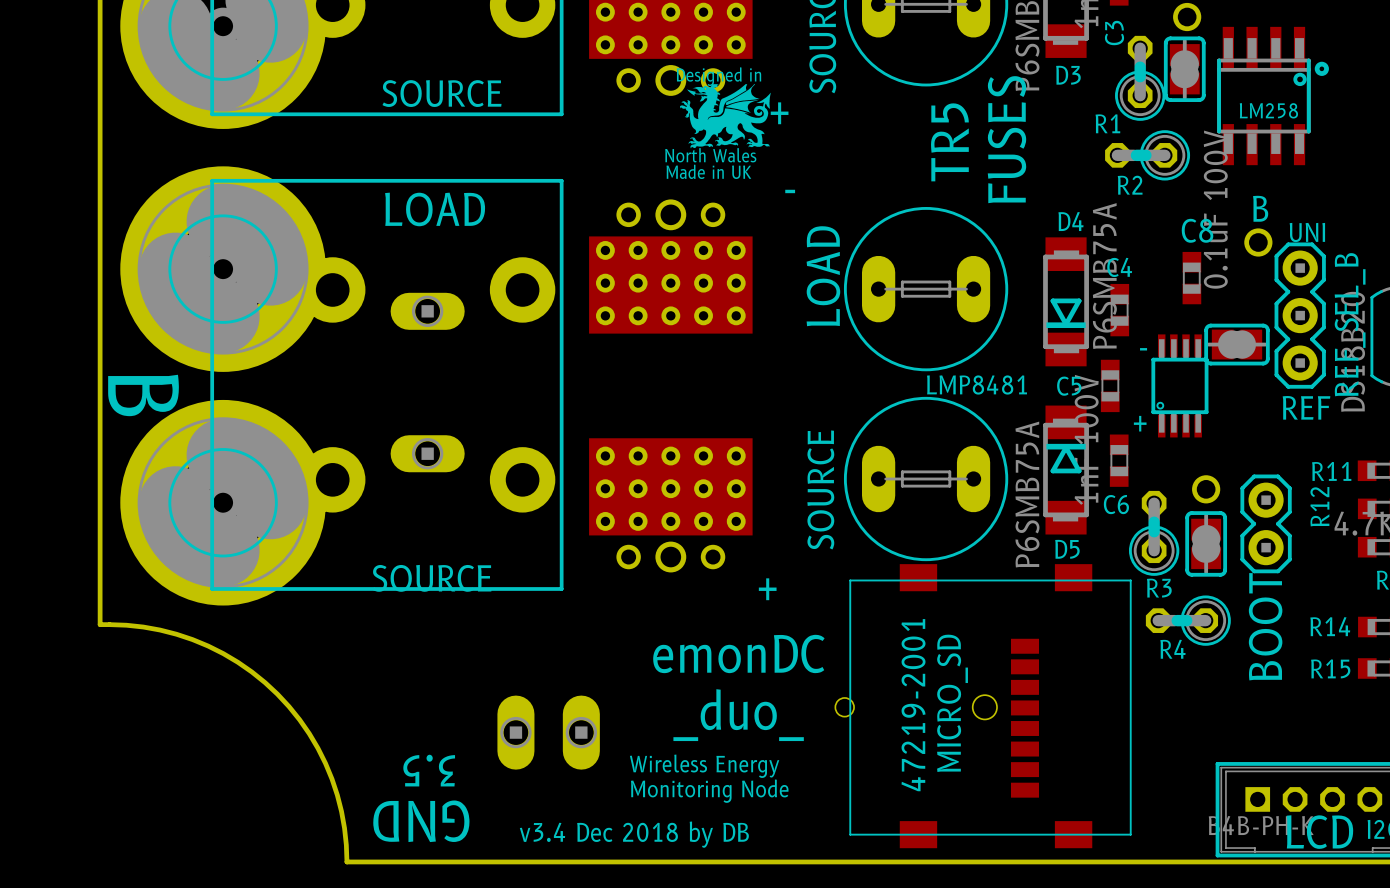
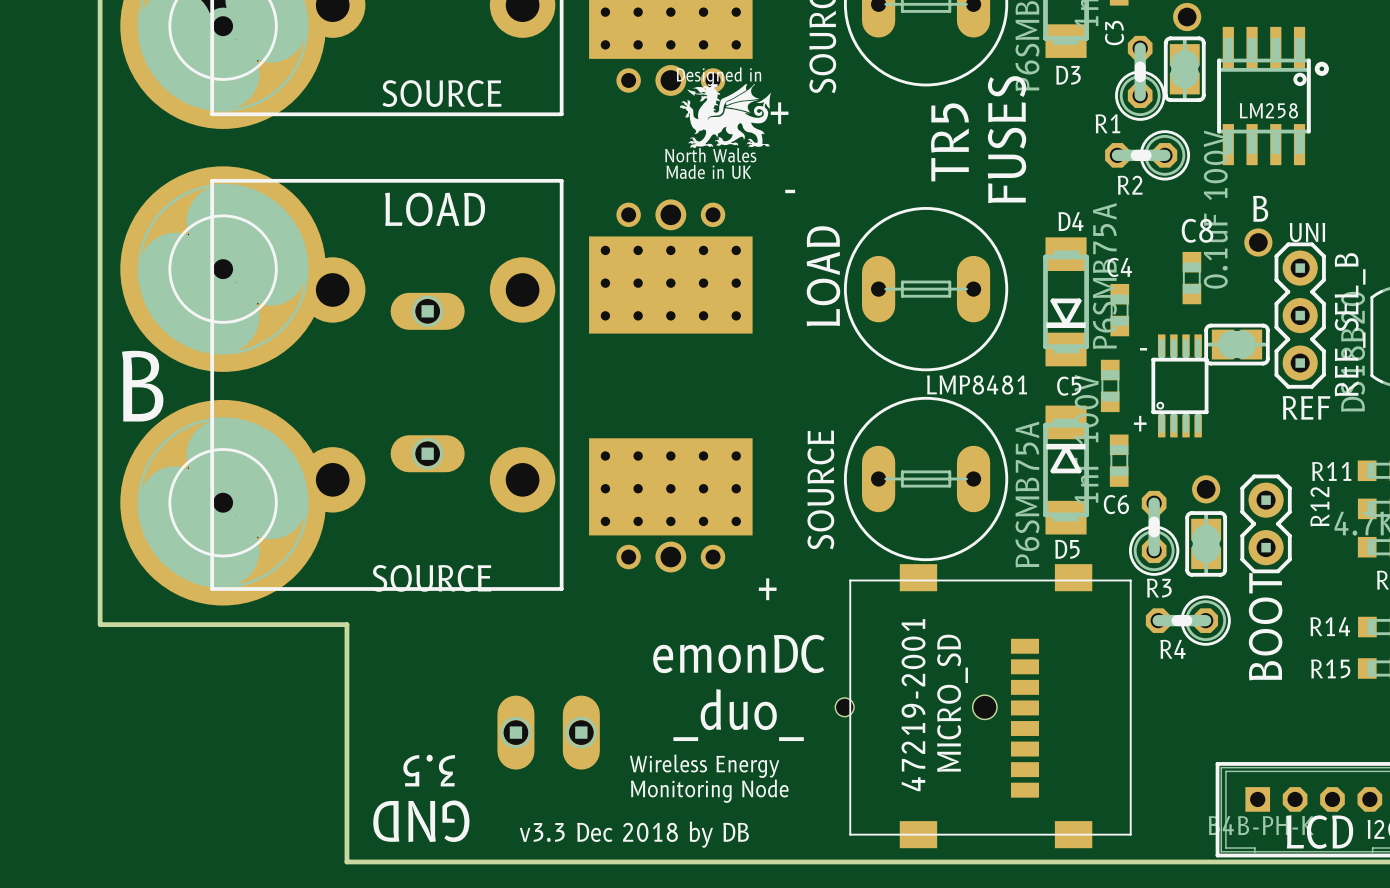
text rotation: 0° (143, 395) -> 90° counterclockwise (142, 386)
board edge: (109, 624) (160, 630) (192, 639) (237, 662) (277, 694) (309, 733) (331, 779) (341, 811) (346, 861) -> (109, 624) (346, 624) (346, 861)
text: v3.4 Dec 2018 by DB (634, 834) -> v3.3 Dec 2018 by DB (634, 834)

